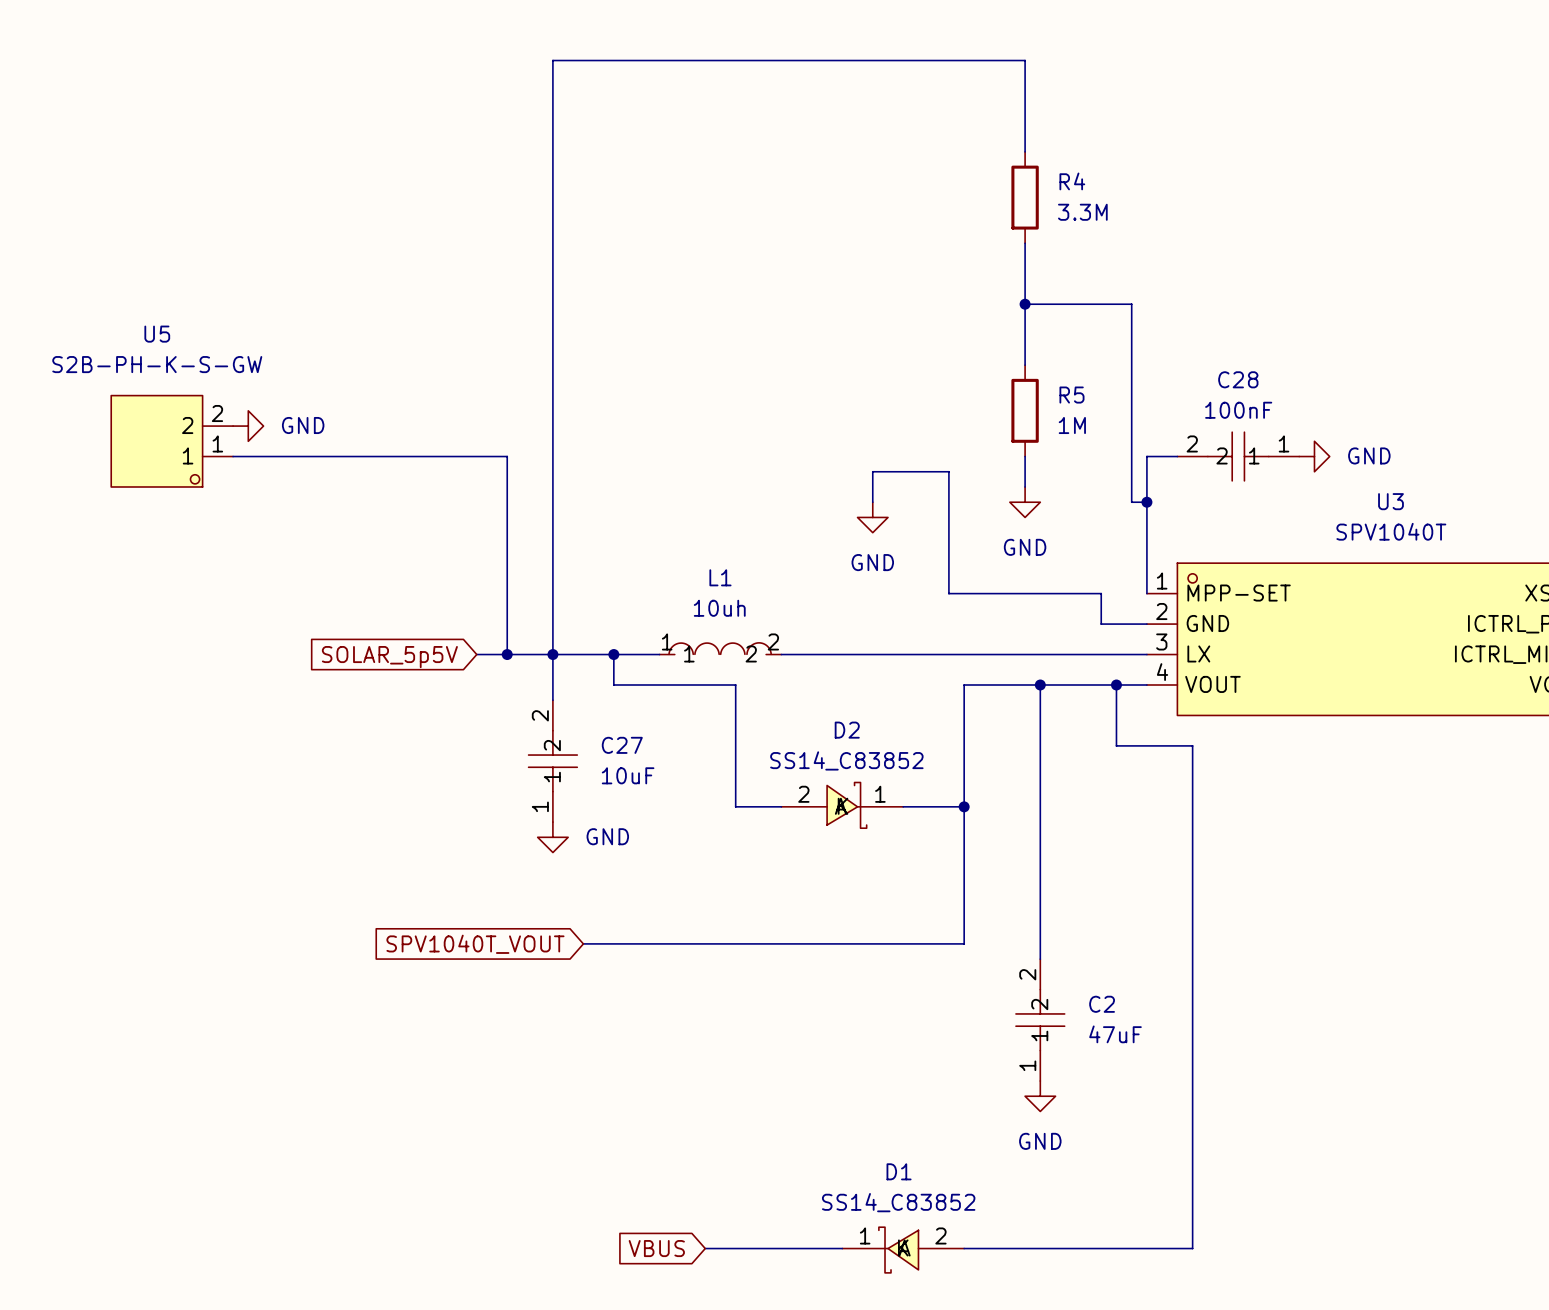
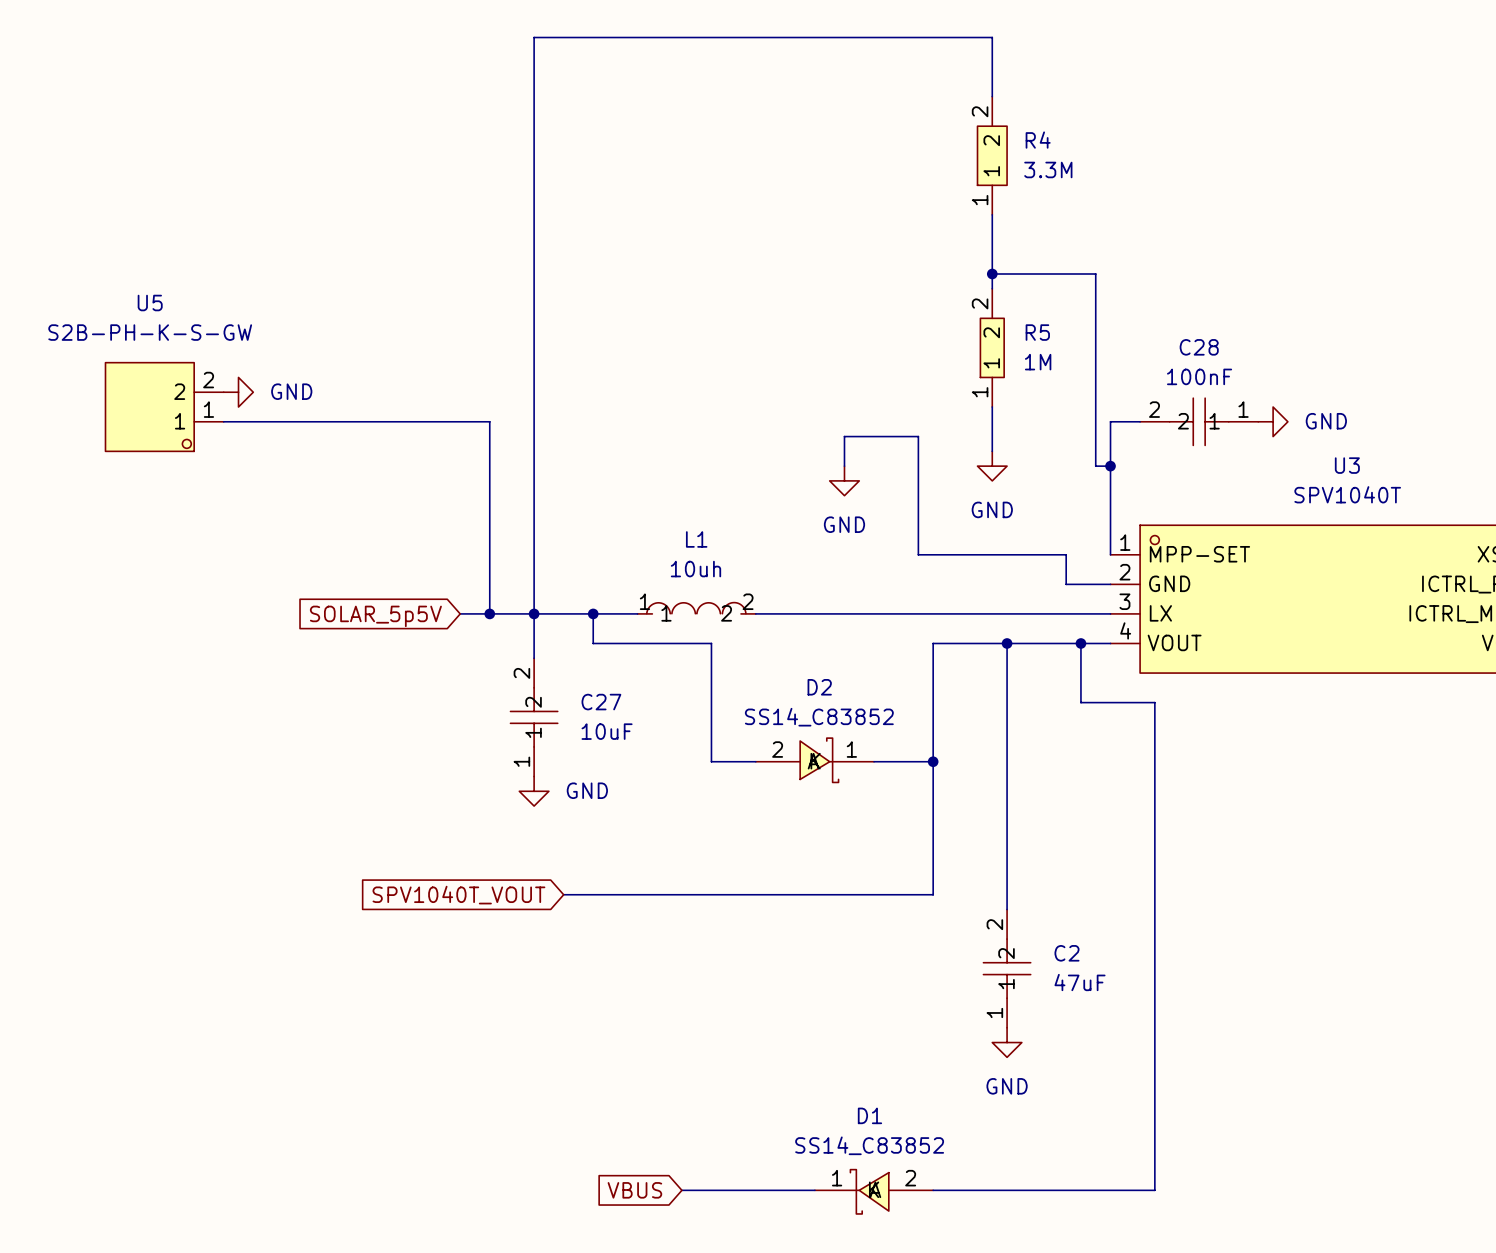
R4 symbol: [1011, 151, 1039, 244] -> [977, 96, 1008, 215]
R5 symbol: [1011, 365, 1039, 457] -> [980, 288, 1005, 408]

